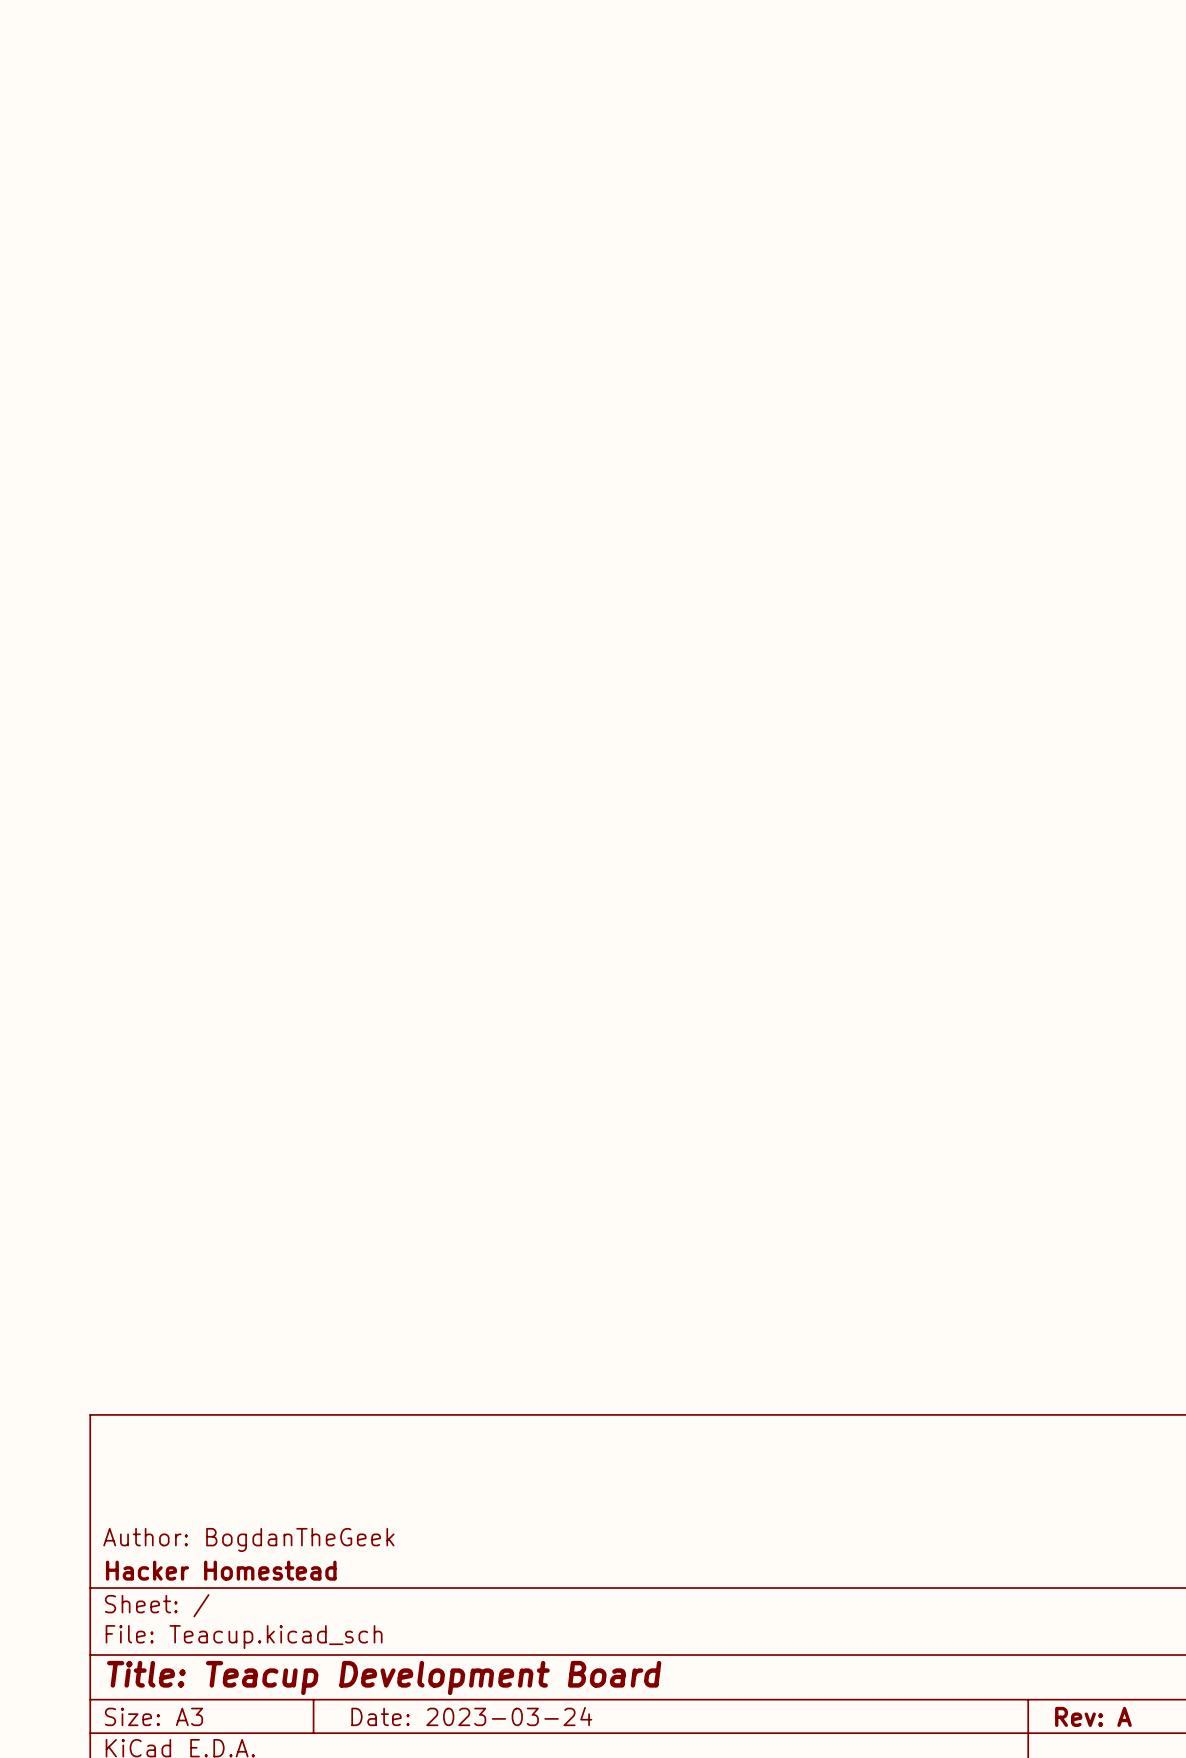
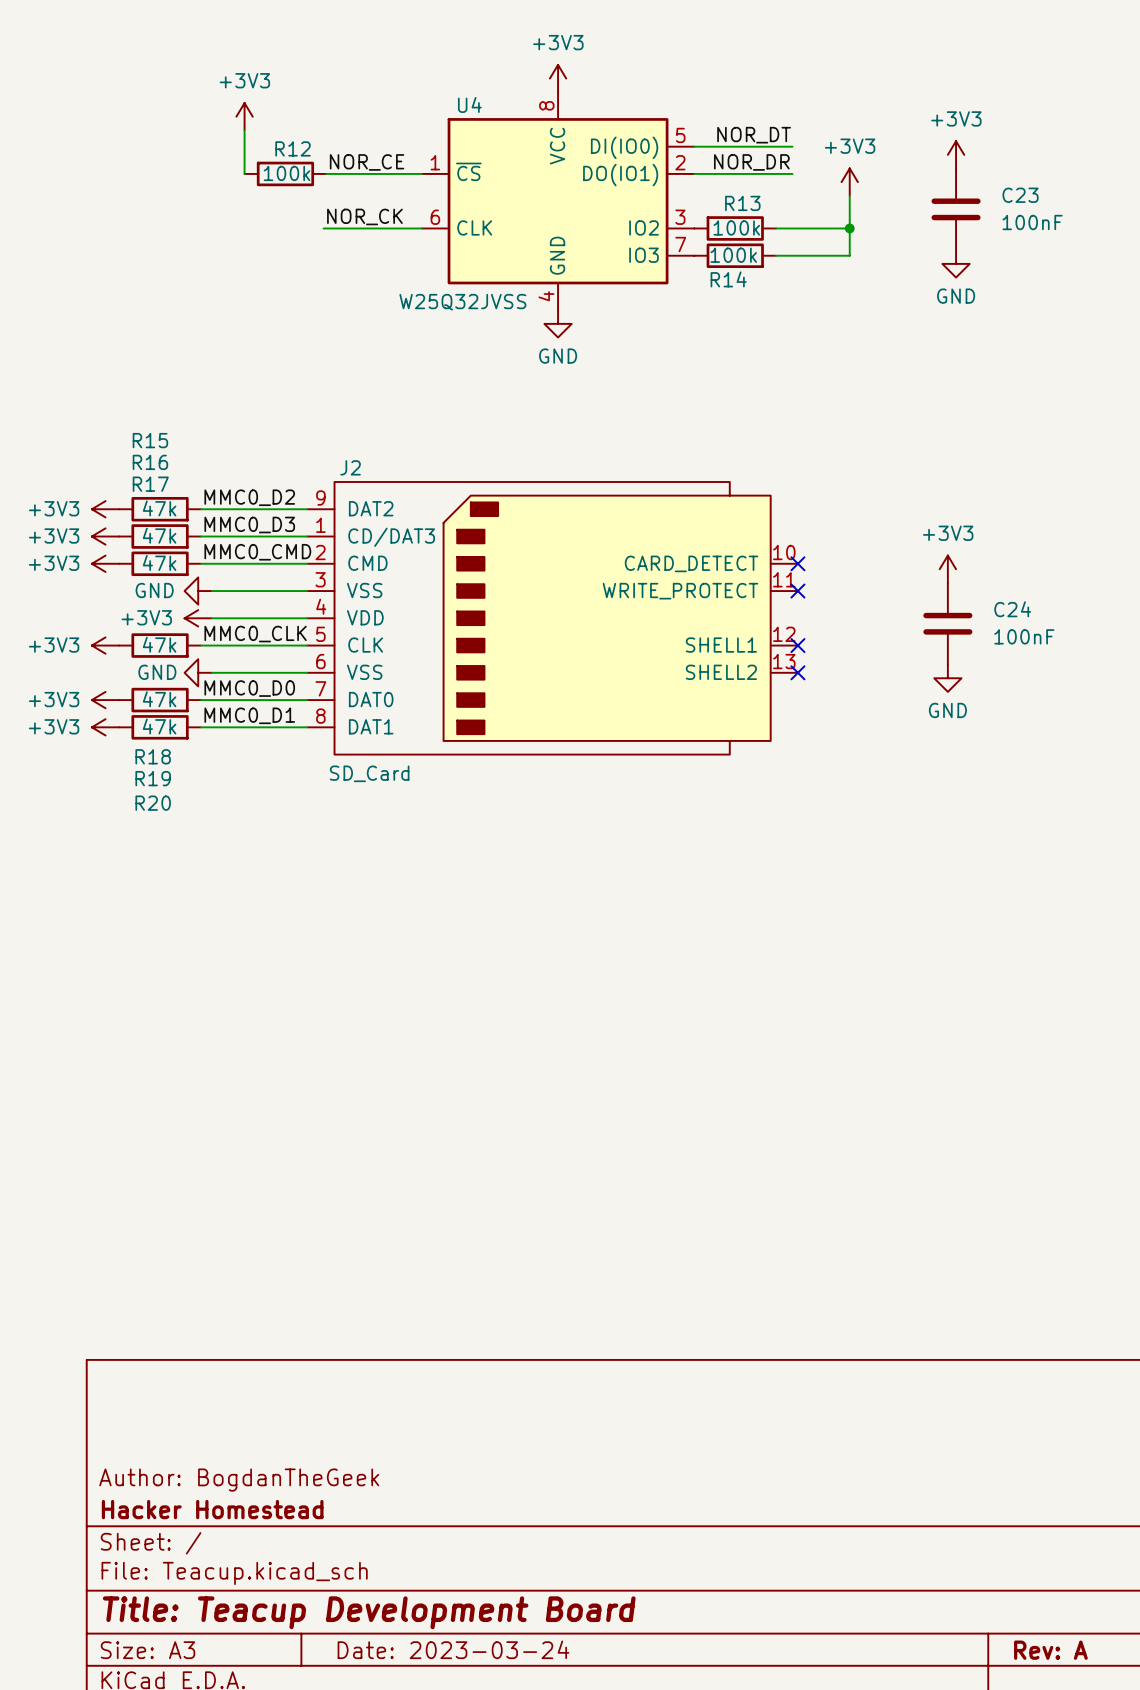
power symbol: none -> +3V3 (558, 78)
power symbol: none -> +3V3 (244, 116)
wire: none -> (244, 130) (244, 173)
label: none -> NOR_DT (754, 135)
wire: none -> (694, 146) (792, 146)
power symbol: none -> +3V3 (956, 154)
label: none -> NOR_CE (367, 162)
label: none -> NOR_DR (751, 162)
R12: none -> 100k (285, 173)
wire: none -> (326, 173) (421, 173)
wire: none -> (694, 173) (792, 173)
power symbol: none -> +3V3 (849, 182)
wire: none -> (849, 195) (849, 255) (776, 255)
U4: none -> W25Q32JVSS (558, 201)
C23: none -> 100nF (956, 209)
label: none -> NOR_CK (364, 216)
wire: none -> (323, 228) (421, 228)
R13: none -> 100k (735, 228)
wire: none -> (776, 228) (849, 228)
junction: none -> (849, 228)
R14: none -> 100k (735, 255)
power symbol: none -> GND (956, 263)
power symbol: none -> GND (558, 323)
label: none -> MMC0_D2 (249, 497)
power symbol: none -> +3V3 (105, 509)
R15: none -> 47k (160, 509)
wire: none -> (200, 509) (307, 509)
label: none -> MMC0_D3 (249, 524)
power symbol: none -> +3V3 (105, 536)
R16: none -> 47k (160, 536)
wire: none -> (200, 536) (307, 536)
label: none -> MMC0_CMD (257, 552)
power symbol: none -> +3V3 (105, 563)
R17: none -> 47k (160, 563)
wire: none -> (200, 563) (307, 563)
no-connect mark: none -> (797, 563)
power symbol: none -> +3V3 (947, 569)
power symbol: none -> GND (198, 591)
wire: none -> (211, 591) (307, 591)
no-connect mark: none -> (797, 591)
power symbol: none -> +3V3 (198, 618)
wire: none -> (211, 618) (307, 618)
J2: none -> SD_Card (552, 618)
C24: none -> 100nF (947, 623)
label: none -> MMC0_CLK (255, 634)
power symbol: none -> +3V3 (105, 645)
R18: none -> 47k (160, 645)
wire: none -> (200, 645) (307, 645)
no-connect mark: none -> (797, 645)
power symbol: none -> GND (198, 672)
wire: none -> (211, 672) (307, 672)
no-connect mark: none -> (797, 672)
power symbol: none -> GND (947, 678)
label: none -> MMC0_D0 (249, 688)
power symbol: none -> +3V3 (105, 700)
R19: none -> 47k (160, 700)
wire: none -> (200, 700) (307, 700)
label: none -> MMC0_D1 (249, 715)
power symbol: none -> +3V3 (105, 727)
R20: none -> 47k (160, 727)
wire: none -> (200, 727) (307, 727)

